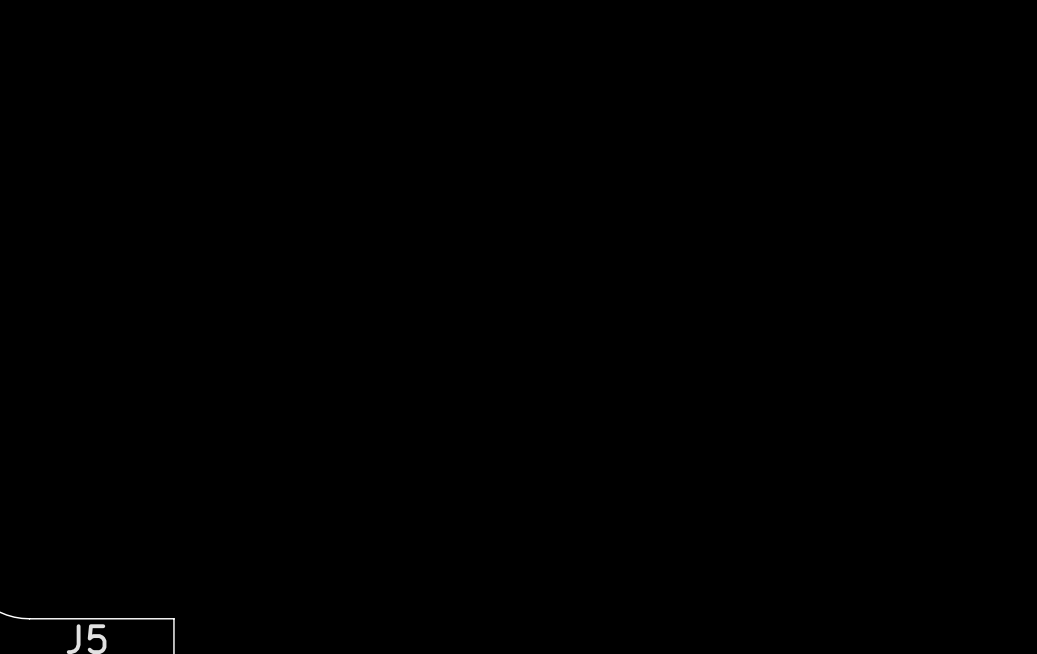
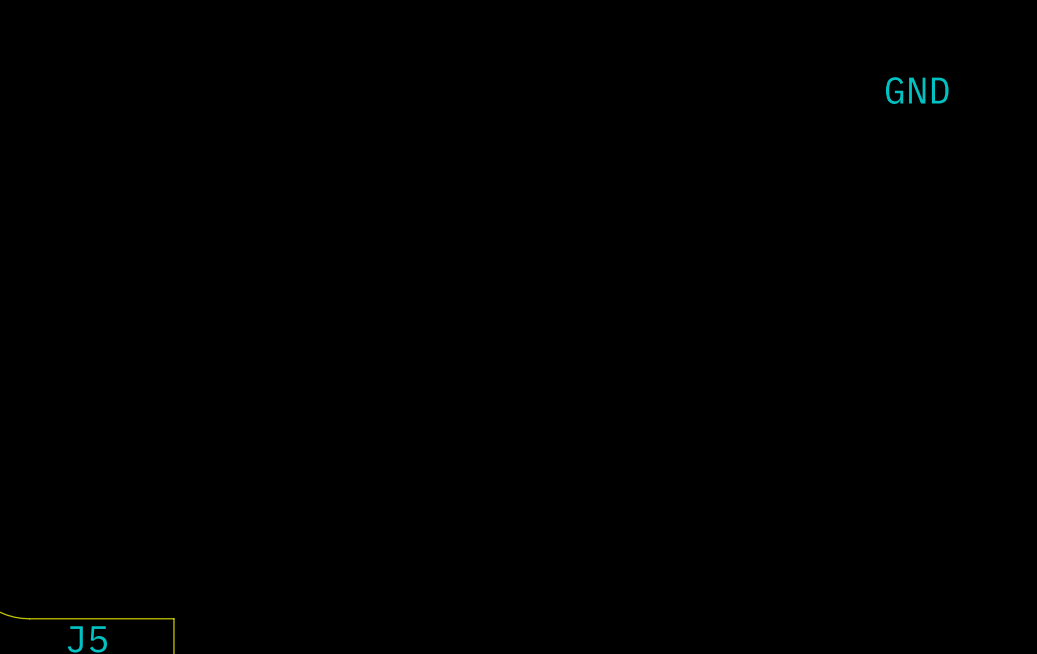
text: none -> GND (917, 90)

